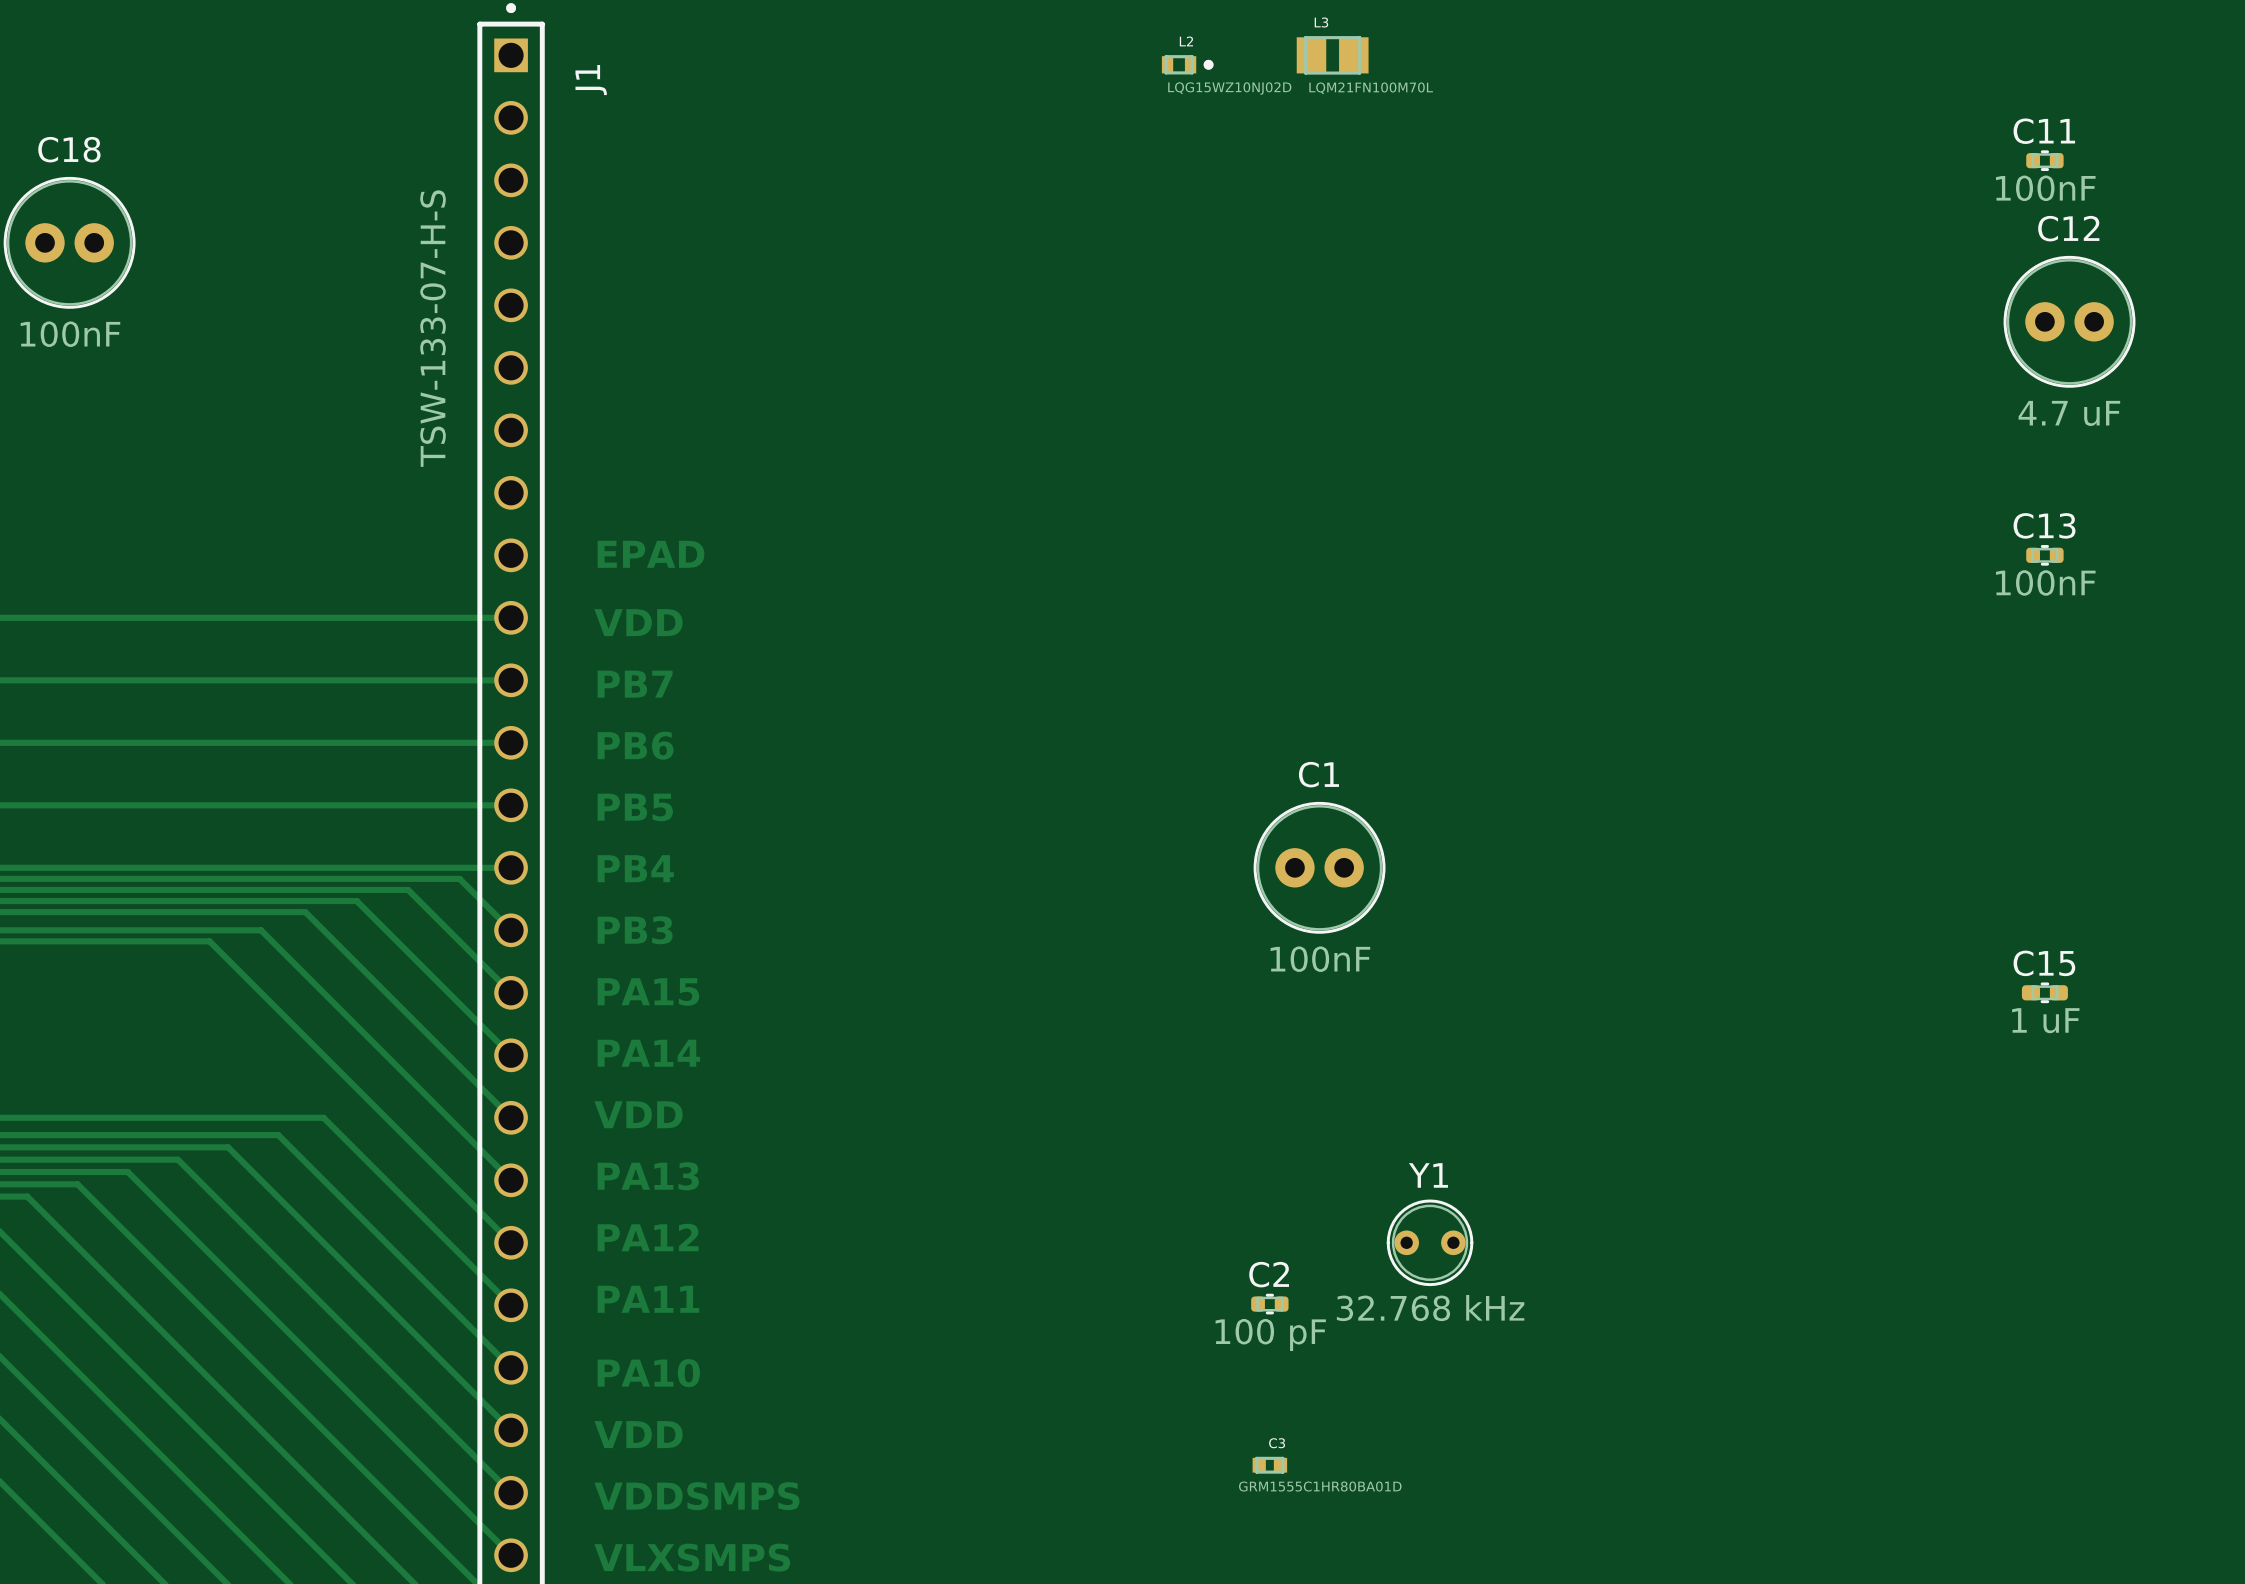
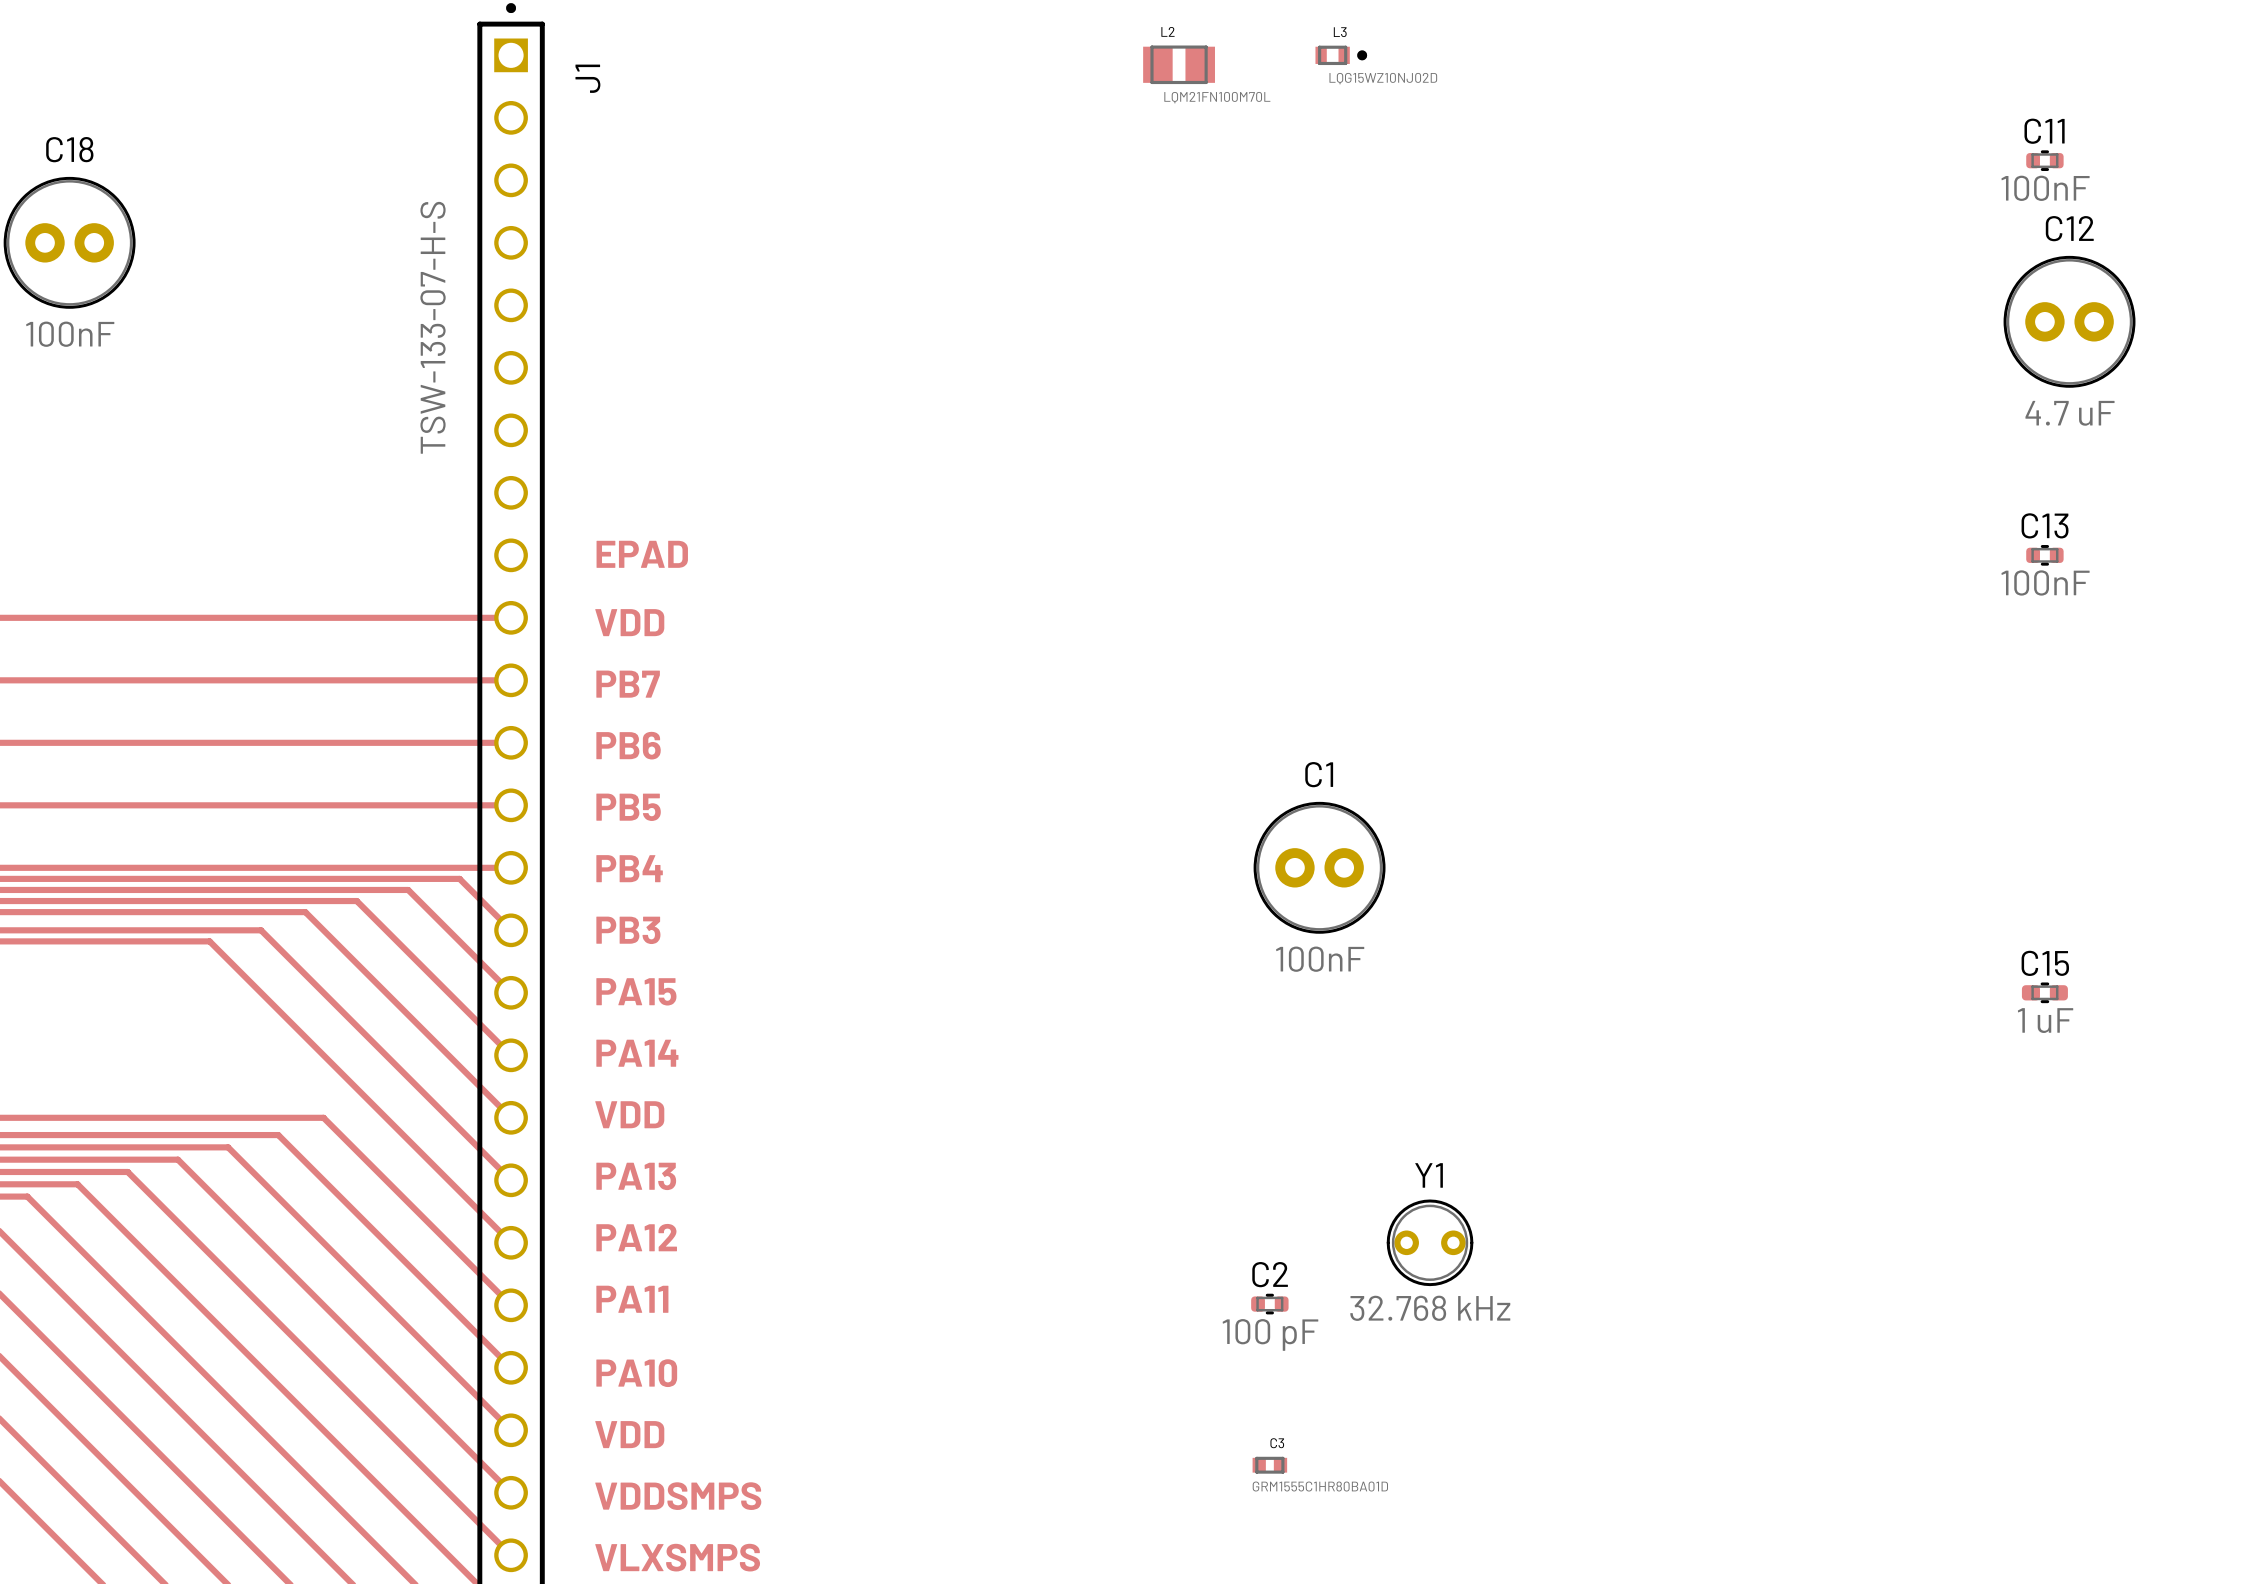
L3 footprint: [1296, 36, 1369, 75] -> [1315, 45, 1368, 66]
L2 footprint: [1161, 55, 1214, 75] -> [1143, 45, 1215, 85]
L2 value: LQG15WZ10NJ02D (1229, 88) -> LQM21FN100M70L (1217, 97)
L3 value: LQM21FN100M70L (1371, 88) -> LQG15WZ10NJ02D (1383, 78)

